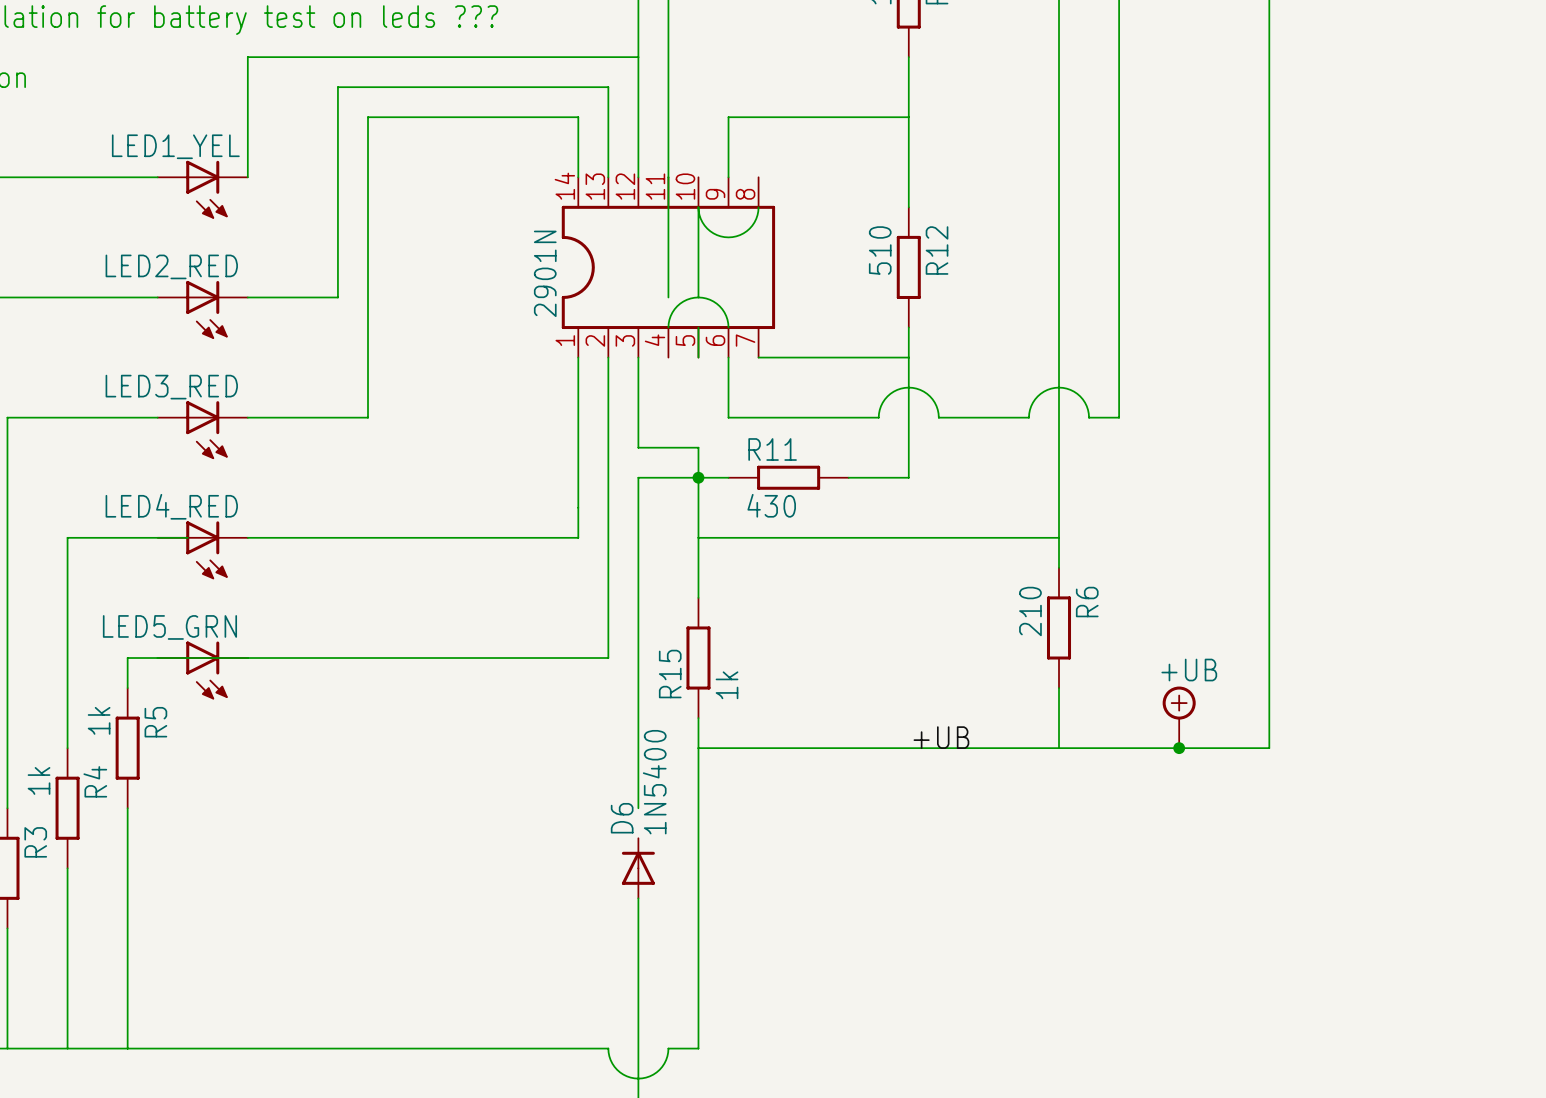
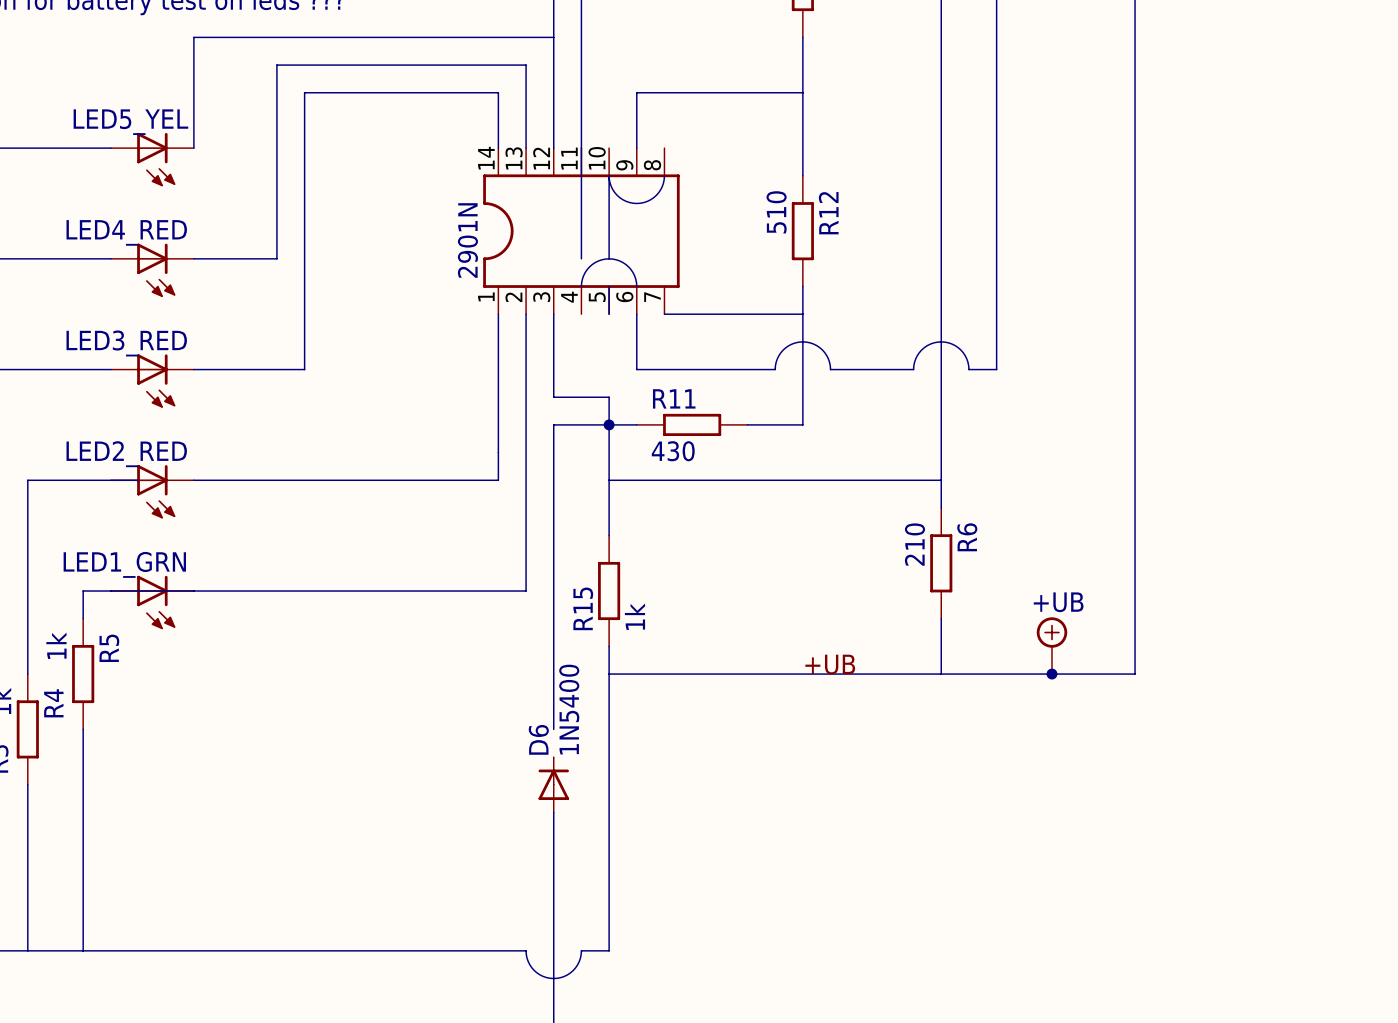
LED1_YEL name: LED1_YEL (175, 146) -> LED5_YEL (130, 122)
LED2_RED name: LED2_RED (171, 266) -> LED4_RED (126, 232)
LED4_RED name: LED4_RED (171, 506) -> LED2_RED (126, 454)
LED5_GRN name: LED5_GRN (169, 627) -> LED1_GRN (124, 564)

